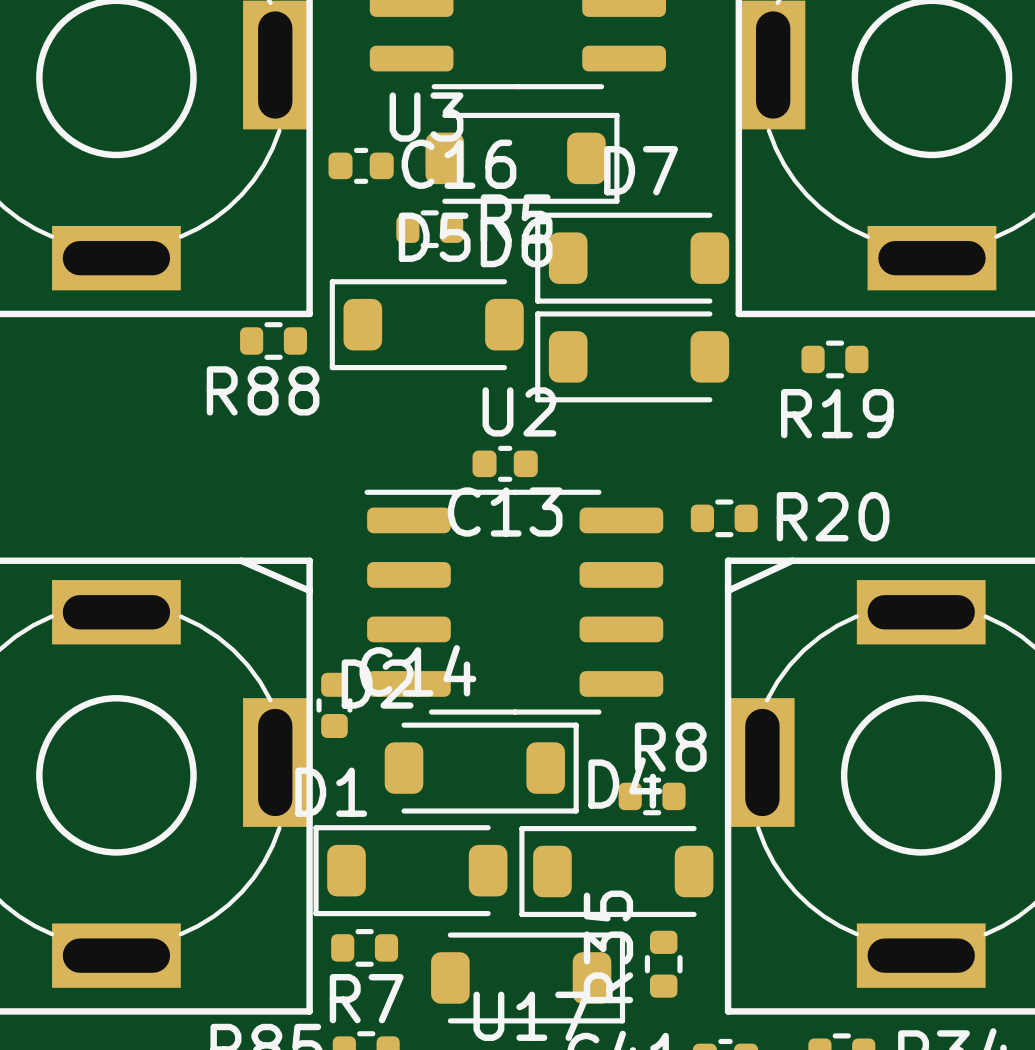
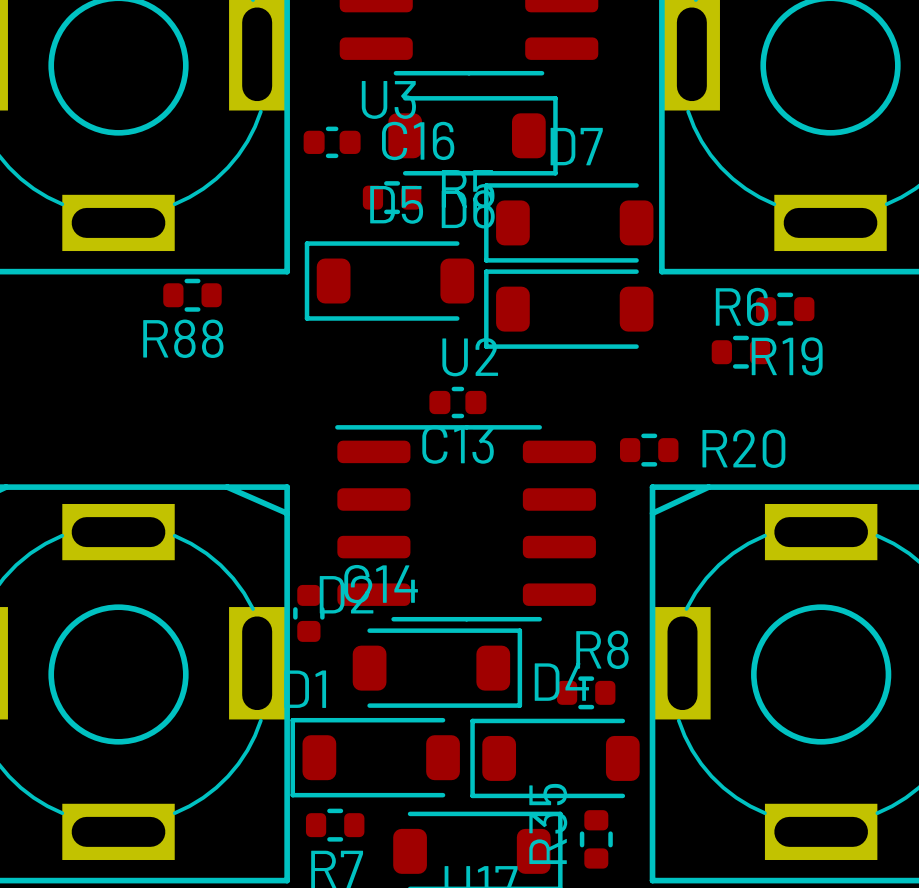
R88 position: (273, 340) -> (192, 295)
R19 position: (834, 359) -> (785, 309)
R6: none -> (740, 352)

